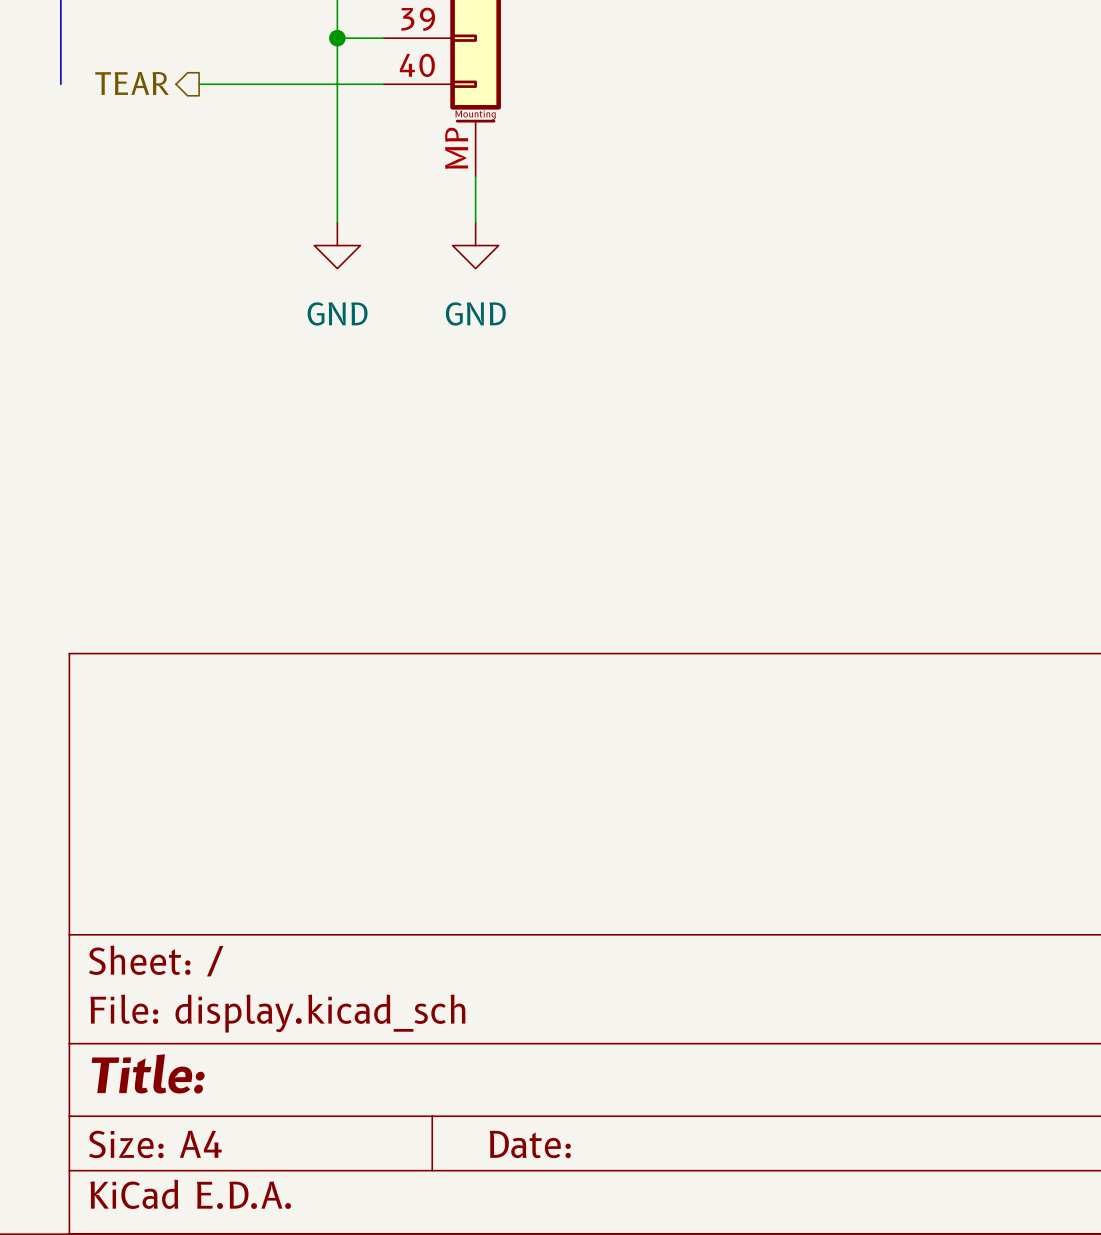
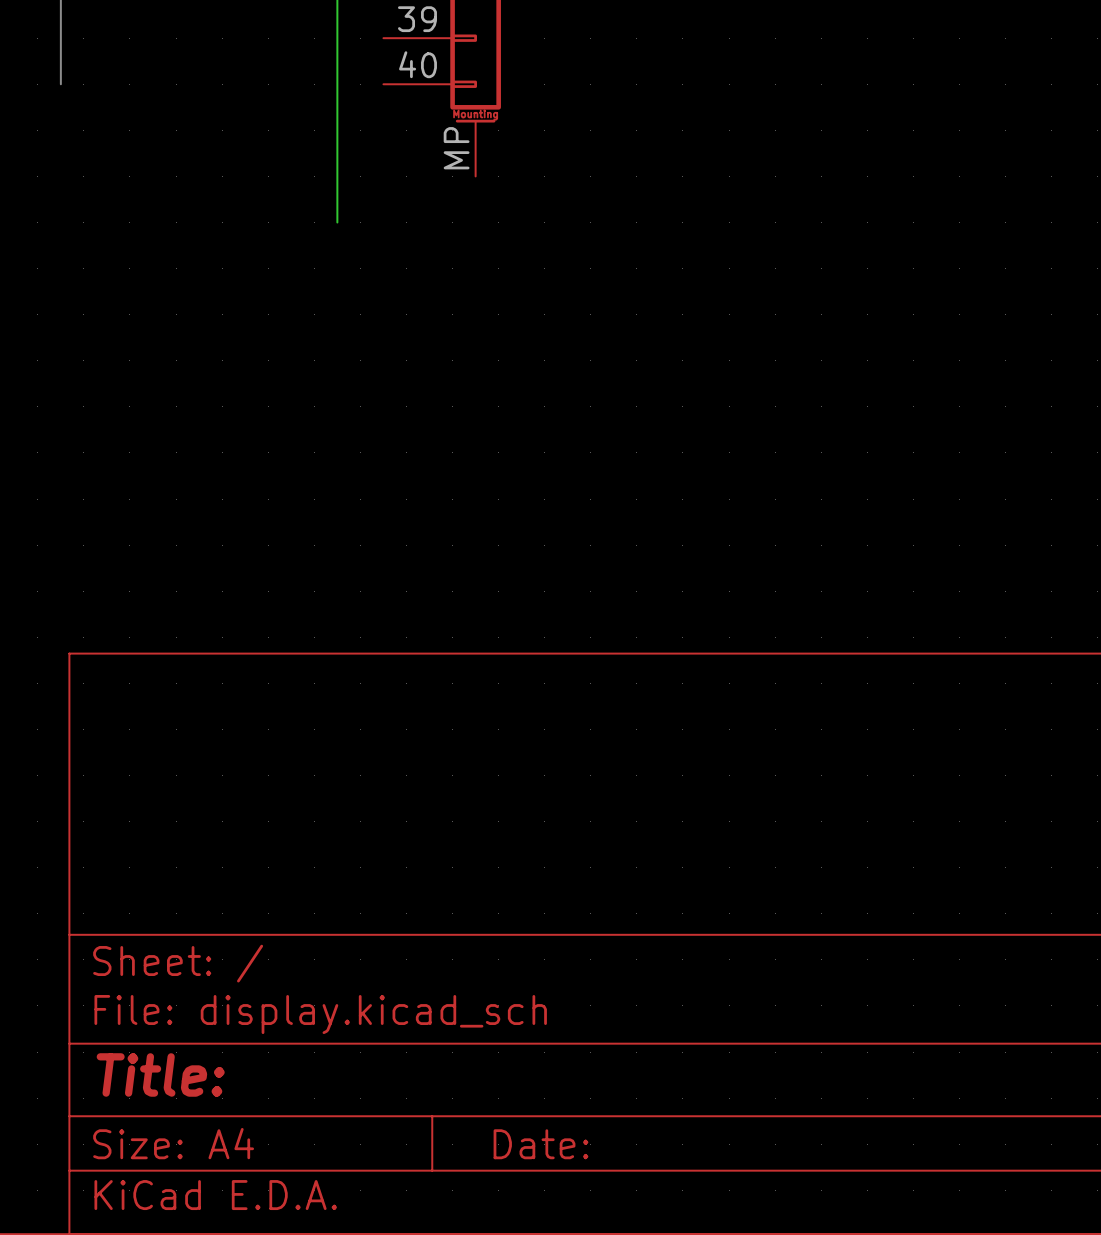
wire: (337, 38) (383, 38) -> none
junction: (337, 38) -> none
hierarchical label: TEAR (132, 83) -> none
wire: (199, 84) (383, 84) -> none
wire: (475, 176) (475, 222) -> none
power symbol: GND (337, 245) -> none
power symbol: GND (475, 245) -> none

